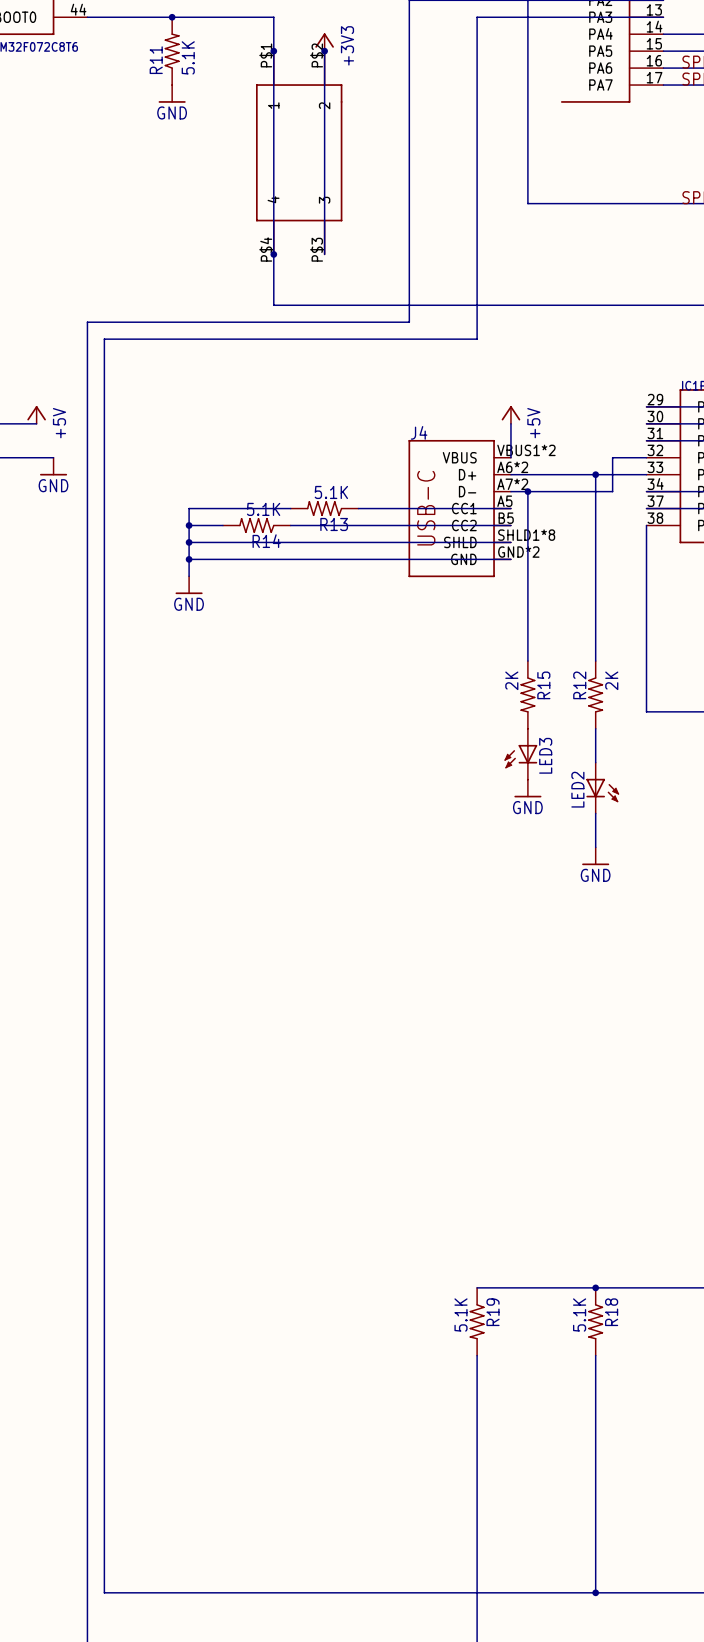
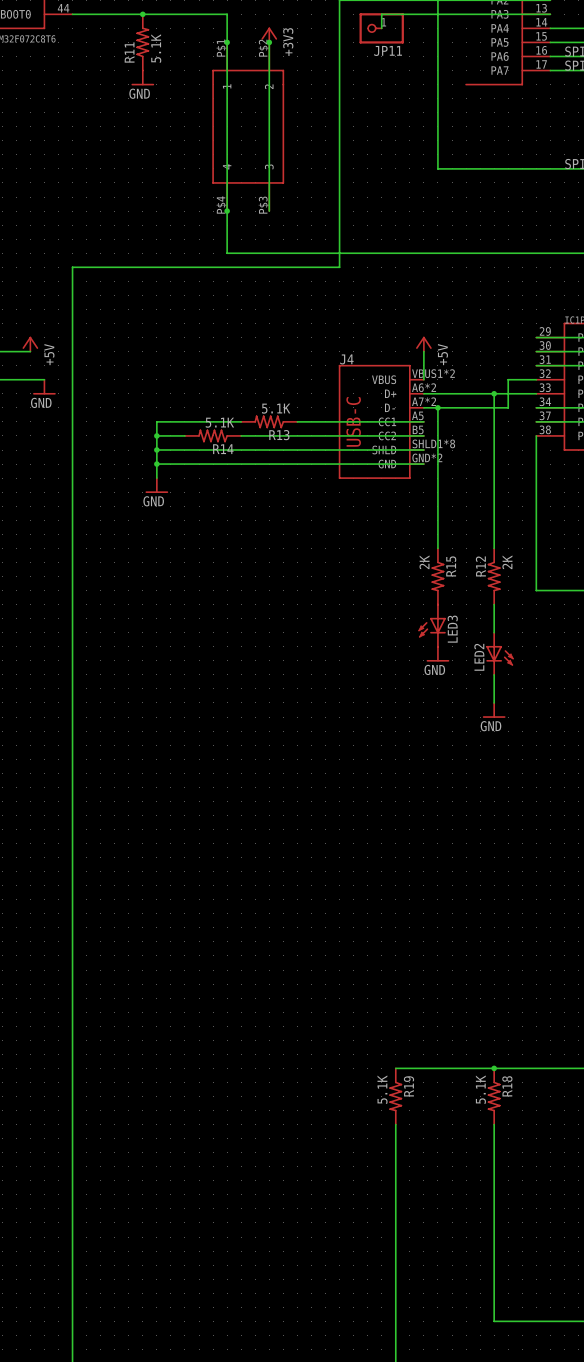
wire: (477, 17) (477, 339) (104, 339) (104, 1592) (595, 1592) -> (395, 14) (381, 14) (381, 28)
JP11: none -> (381, 28)
junction: (595, 1592) -> none

